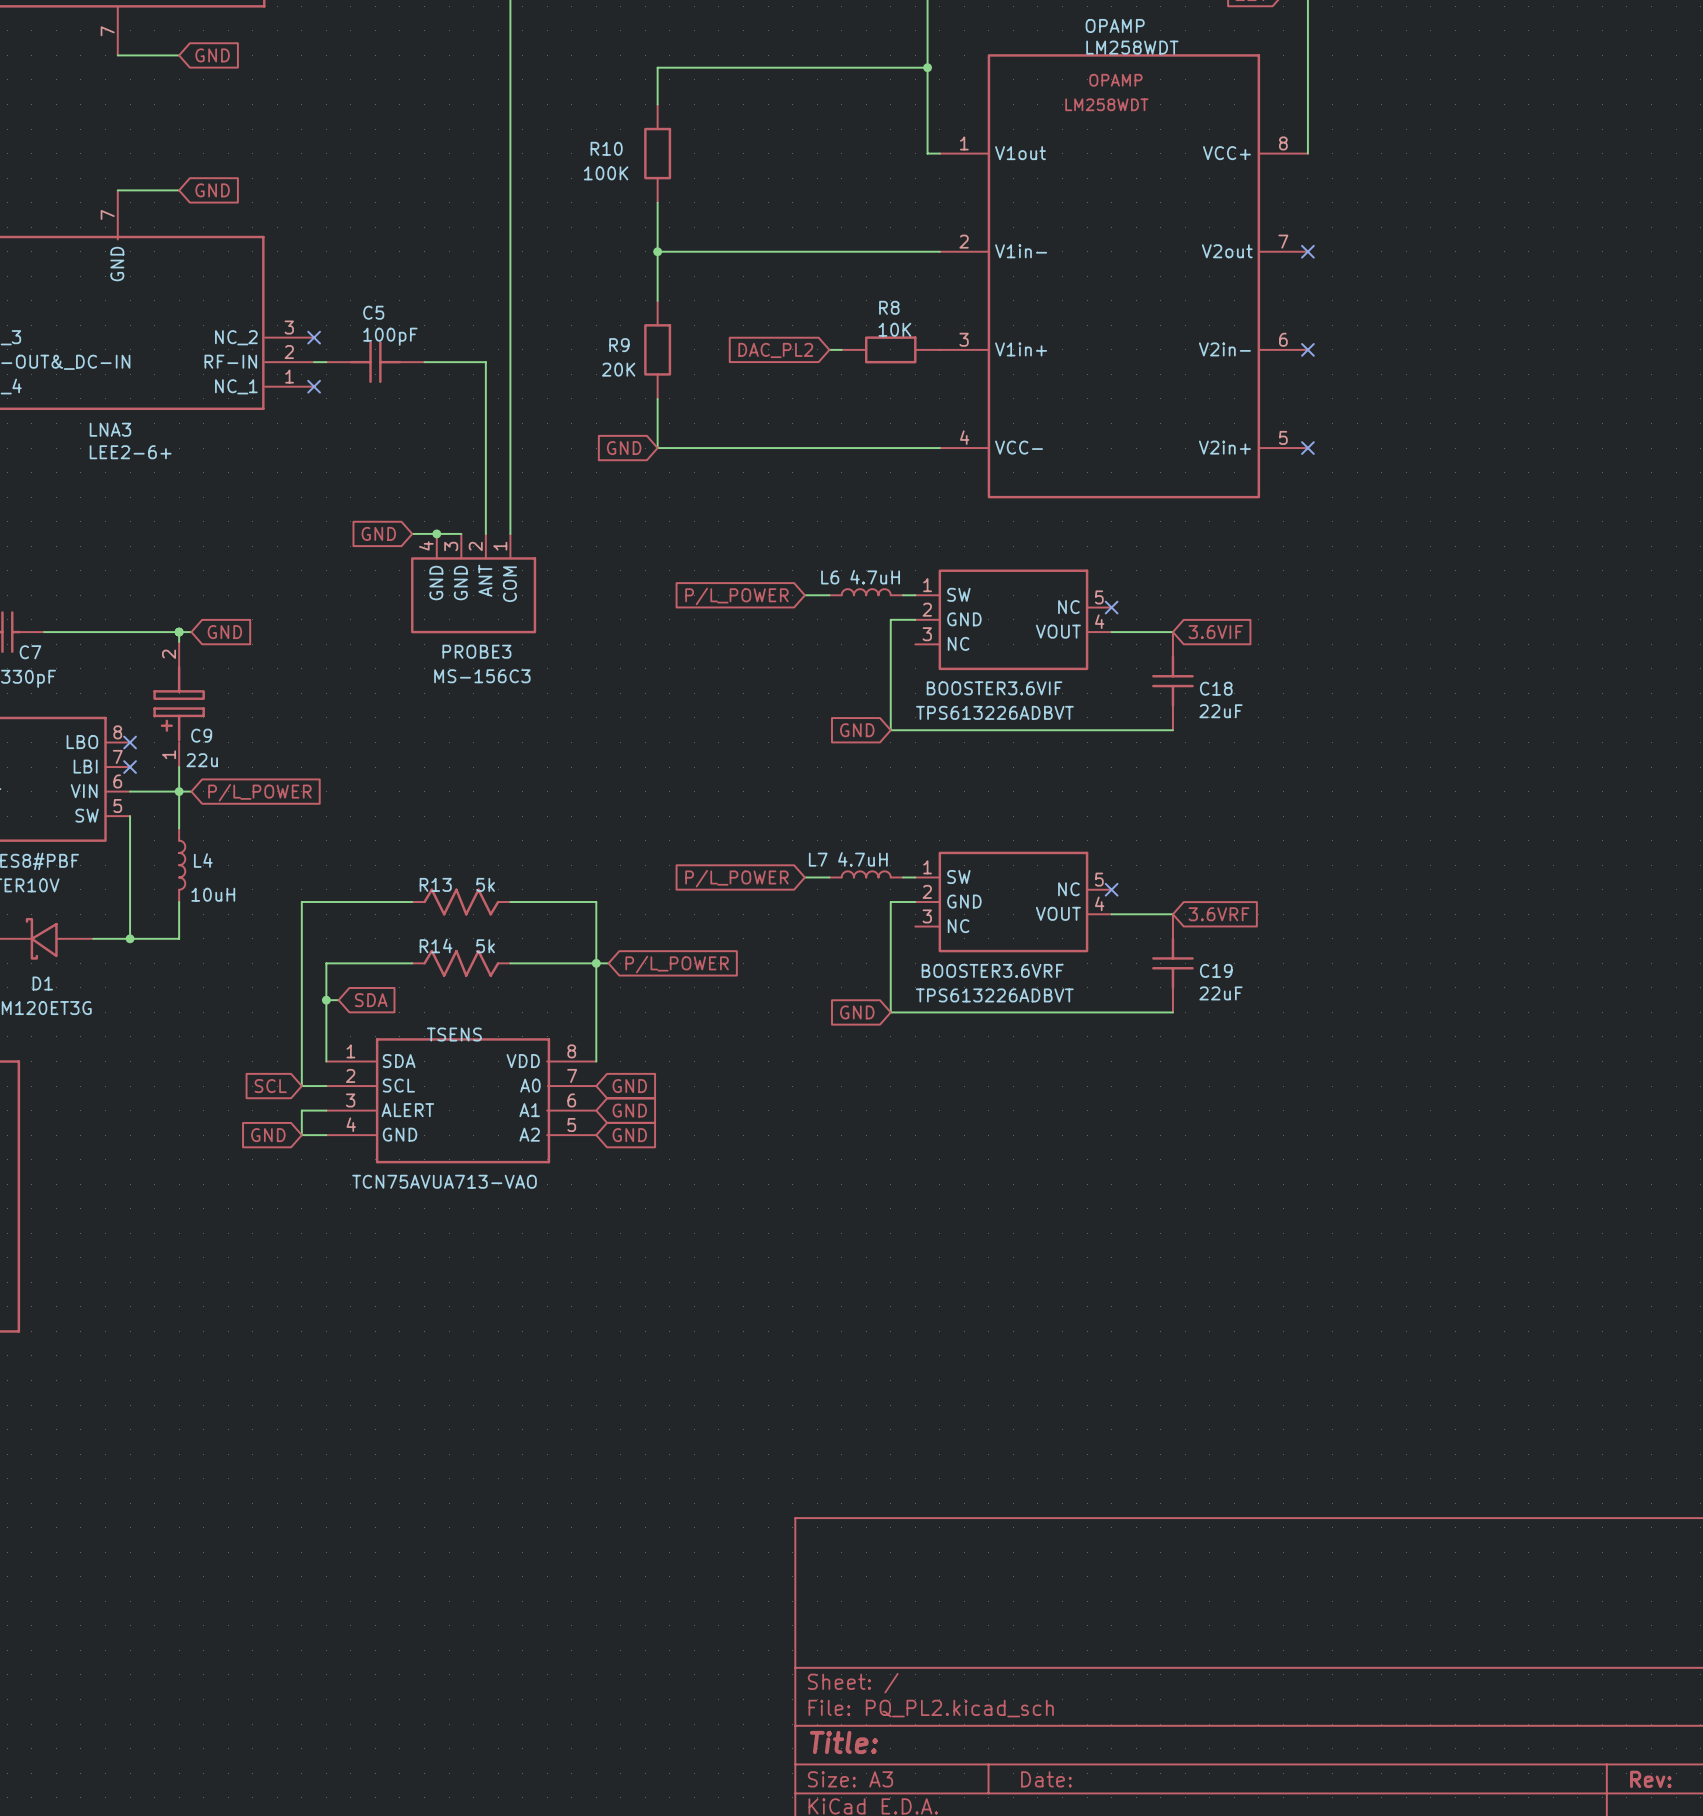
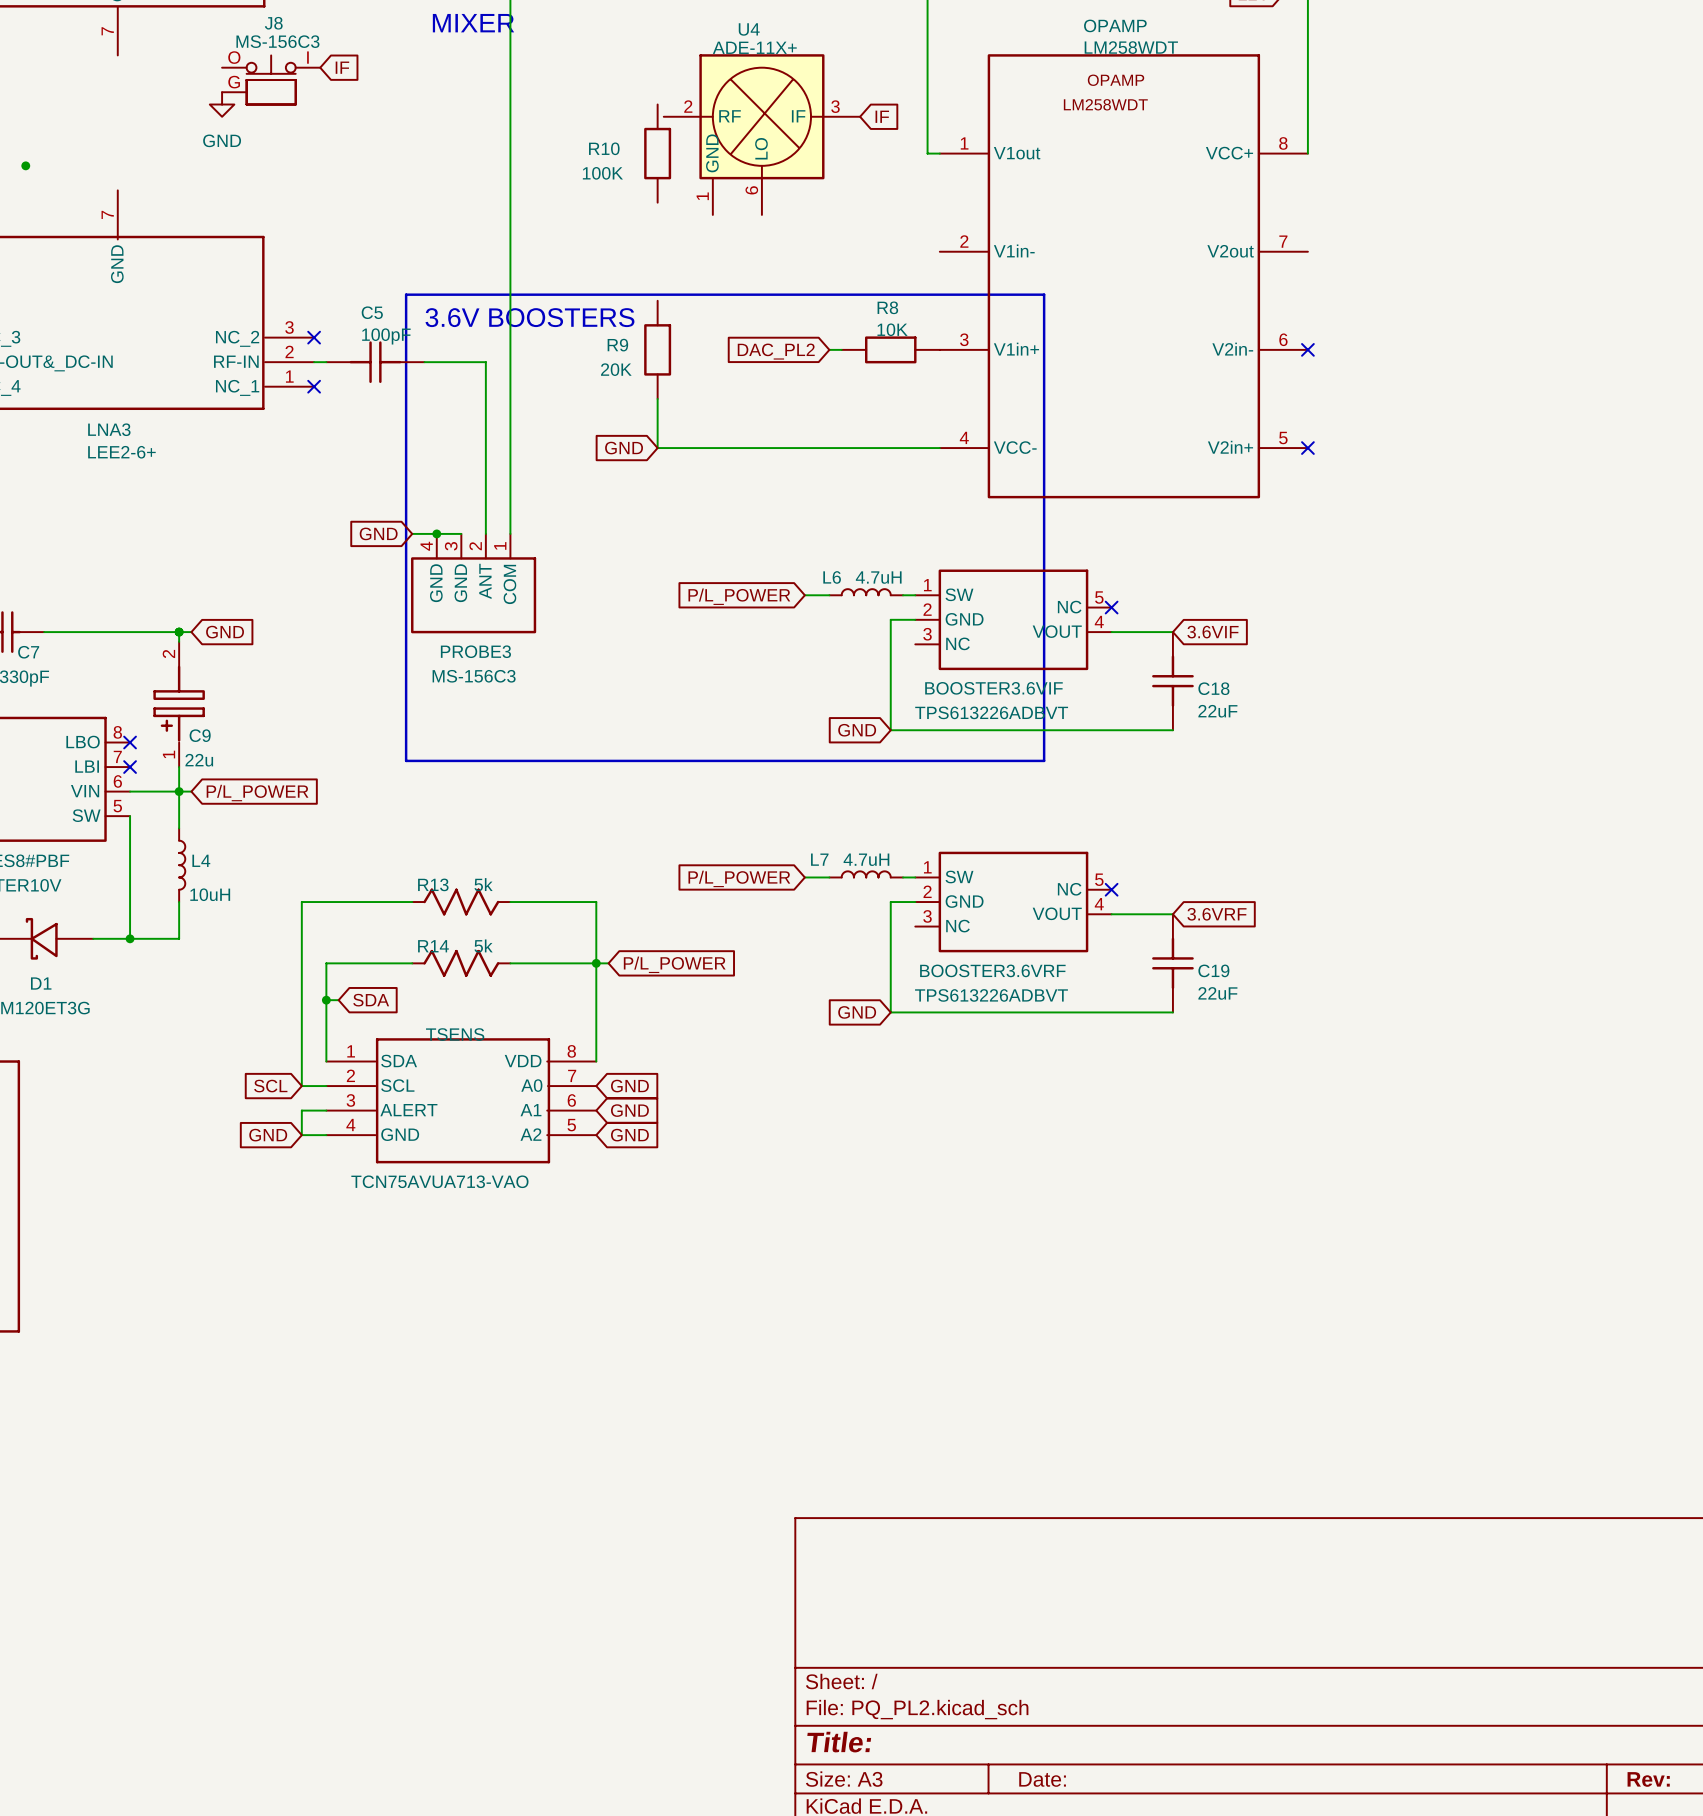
text: none -> MIXER (473, 23)
wire: (117, 55) (179, 55) -> none
global label: GND (212, 55) -> none
global label: none -> IF (342, 67)
wire: (927, 67) (657, 67) (657, 104) -> none
junction: (927, 67) -> none
J8: none -> MS-156C3 (271, 79)
power symbol: none -> GND (222, 104)
global label: none -> IF (882, 116)
U4: none -> ADE-11X+ (761, 134)
junction: none -> (25, 165)
wire: (117, 190) (179, 190) -> none
global label: GND (212, 190) -> none
wire: (657, 202) (657, 300) -> none
wire: (657, 251) (939, 251) -> none
junction: (657, 251) -> none
no-connect mark: (1307, 251) -> none
line: none -> (406, 294) (1044, 294) (1044, 760) (406, 760) (406, 294)
text: none -> 3.6V BOOSTERS (529, 317)

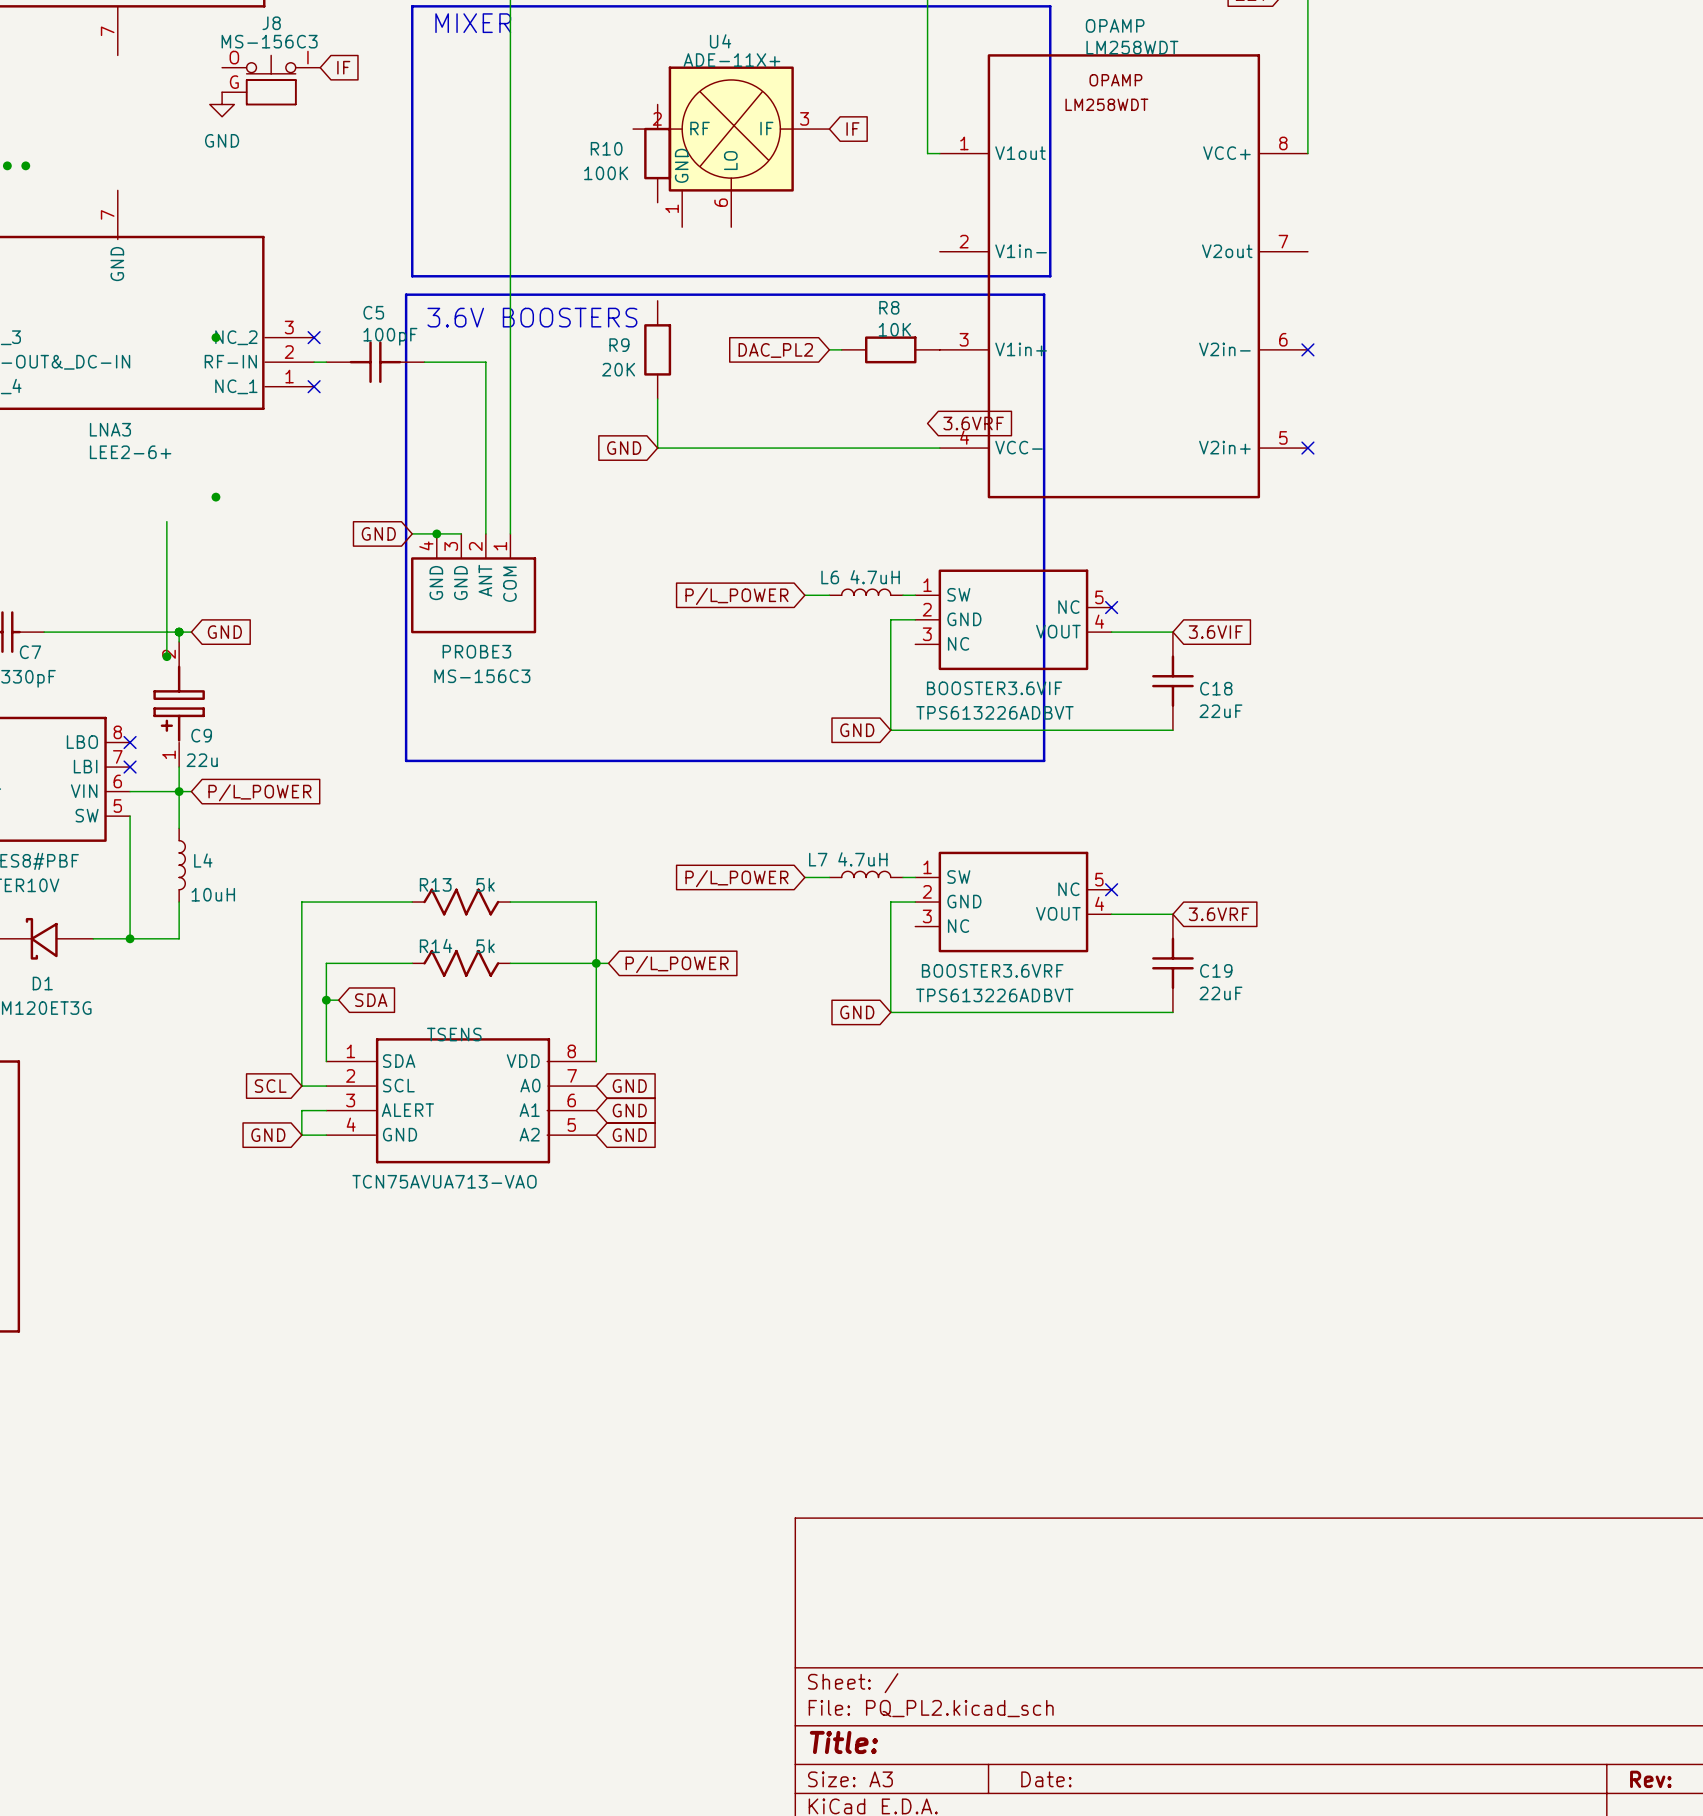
line: none -> (412, 6) (412, 276) (1050, 276) (1050, 6) (412, 6)
global label position: IF (882, 116) -> IF (852, 129)
U4 position: (761, 134) -> (731, 146)
junction: none -> (7, 165)
junction: none -> (215, 337)
global label: none -> 3.6VRF (973, 423)
junction: none -> (215, 497)
wire: none -> (166, 521) (166, 656)
junction: none -> (166, 656)

